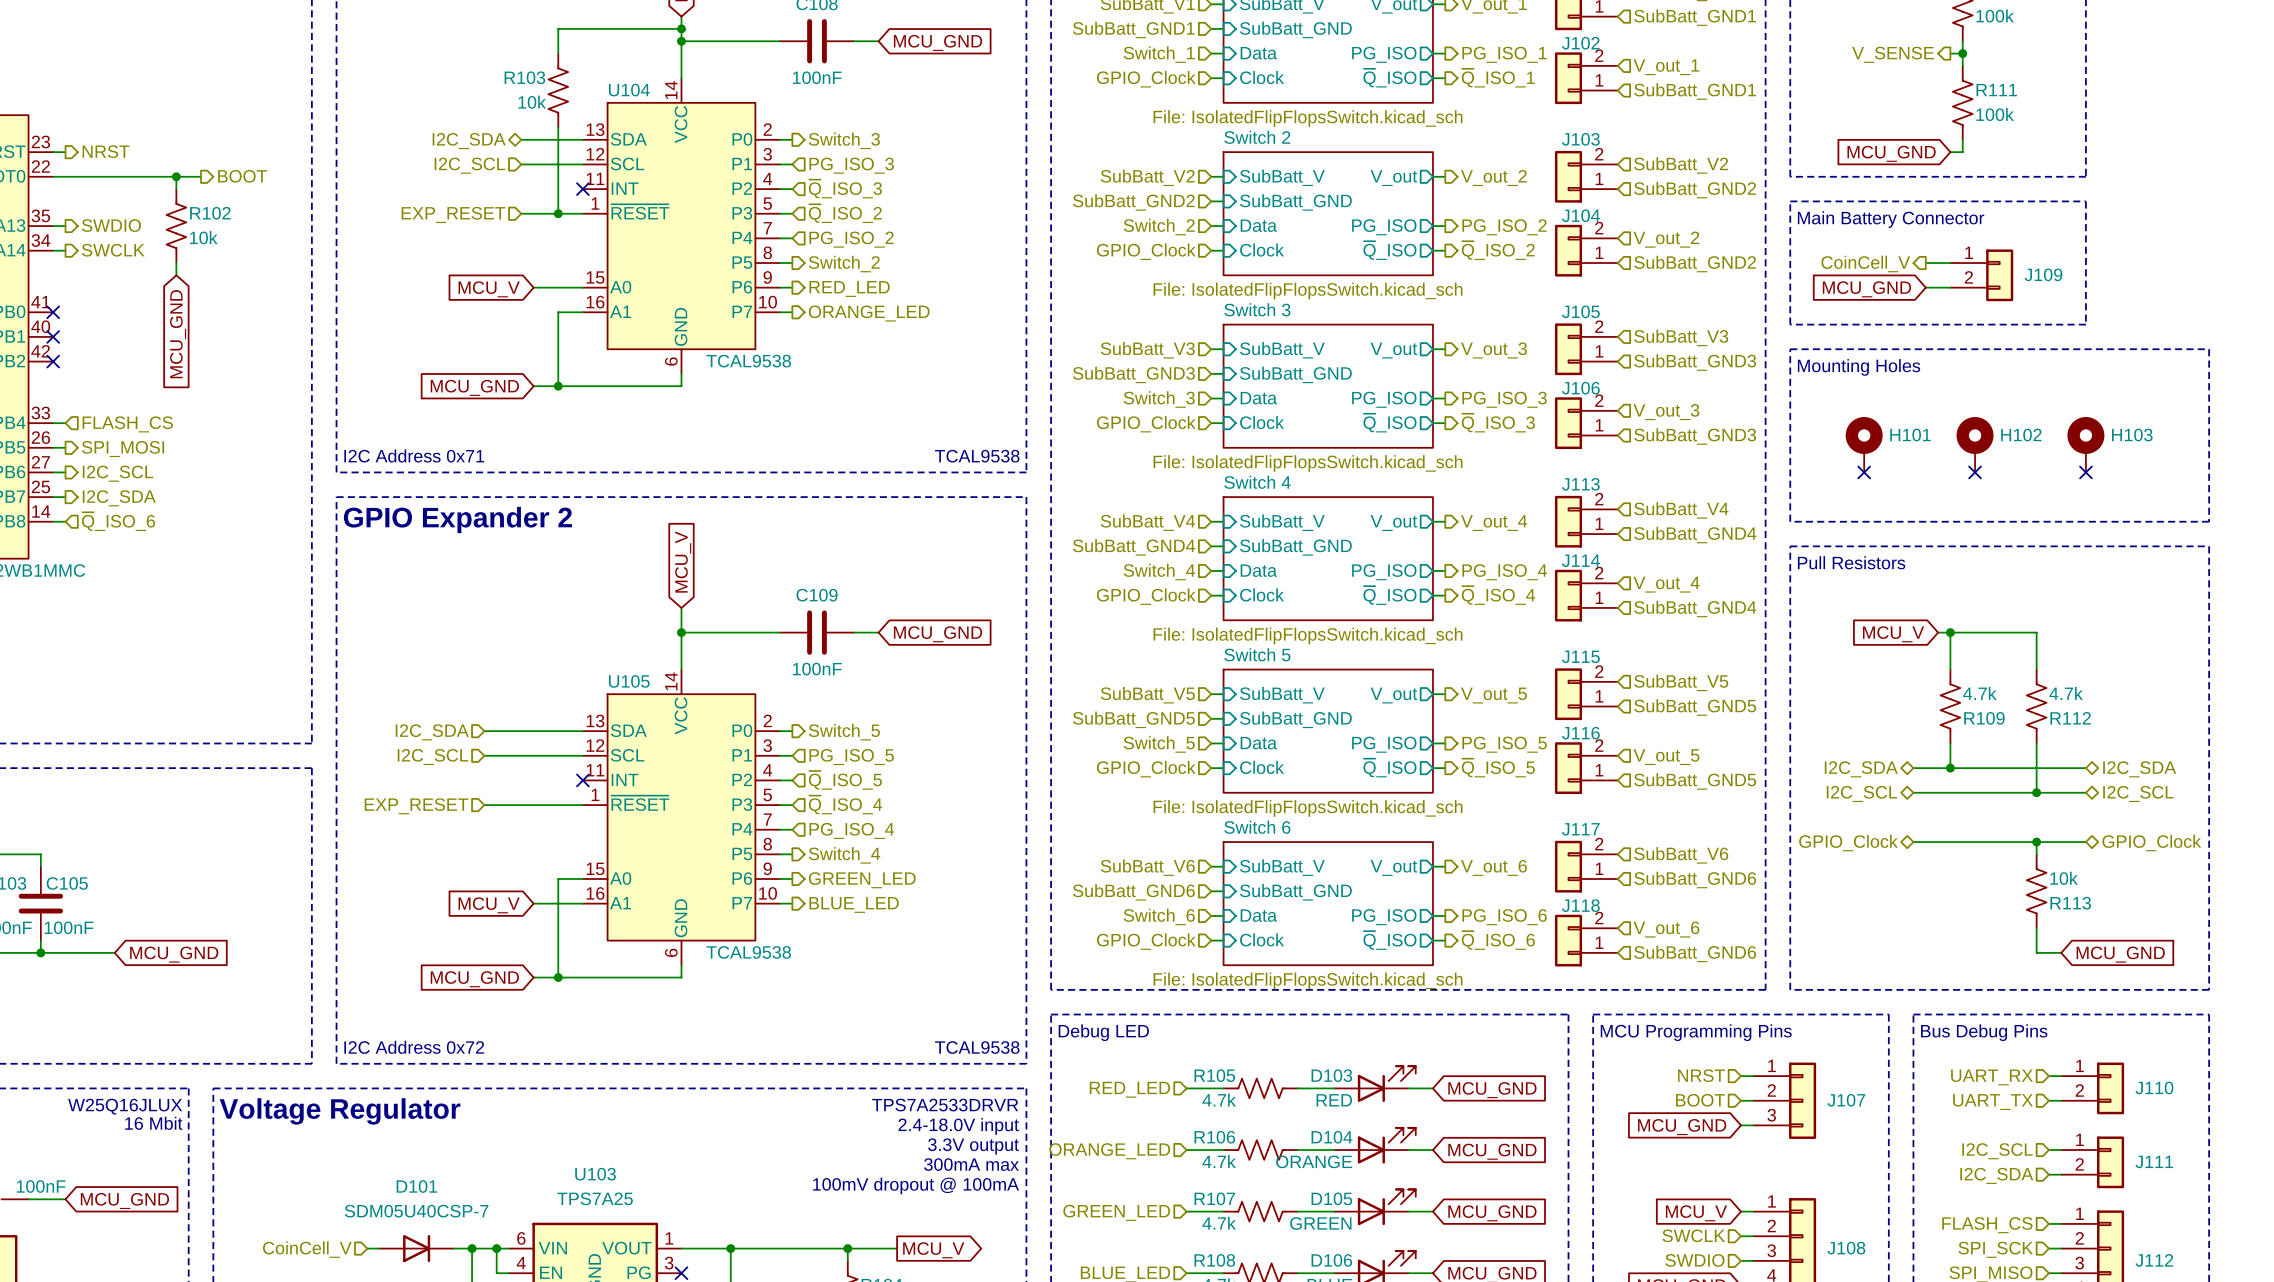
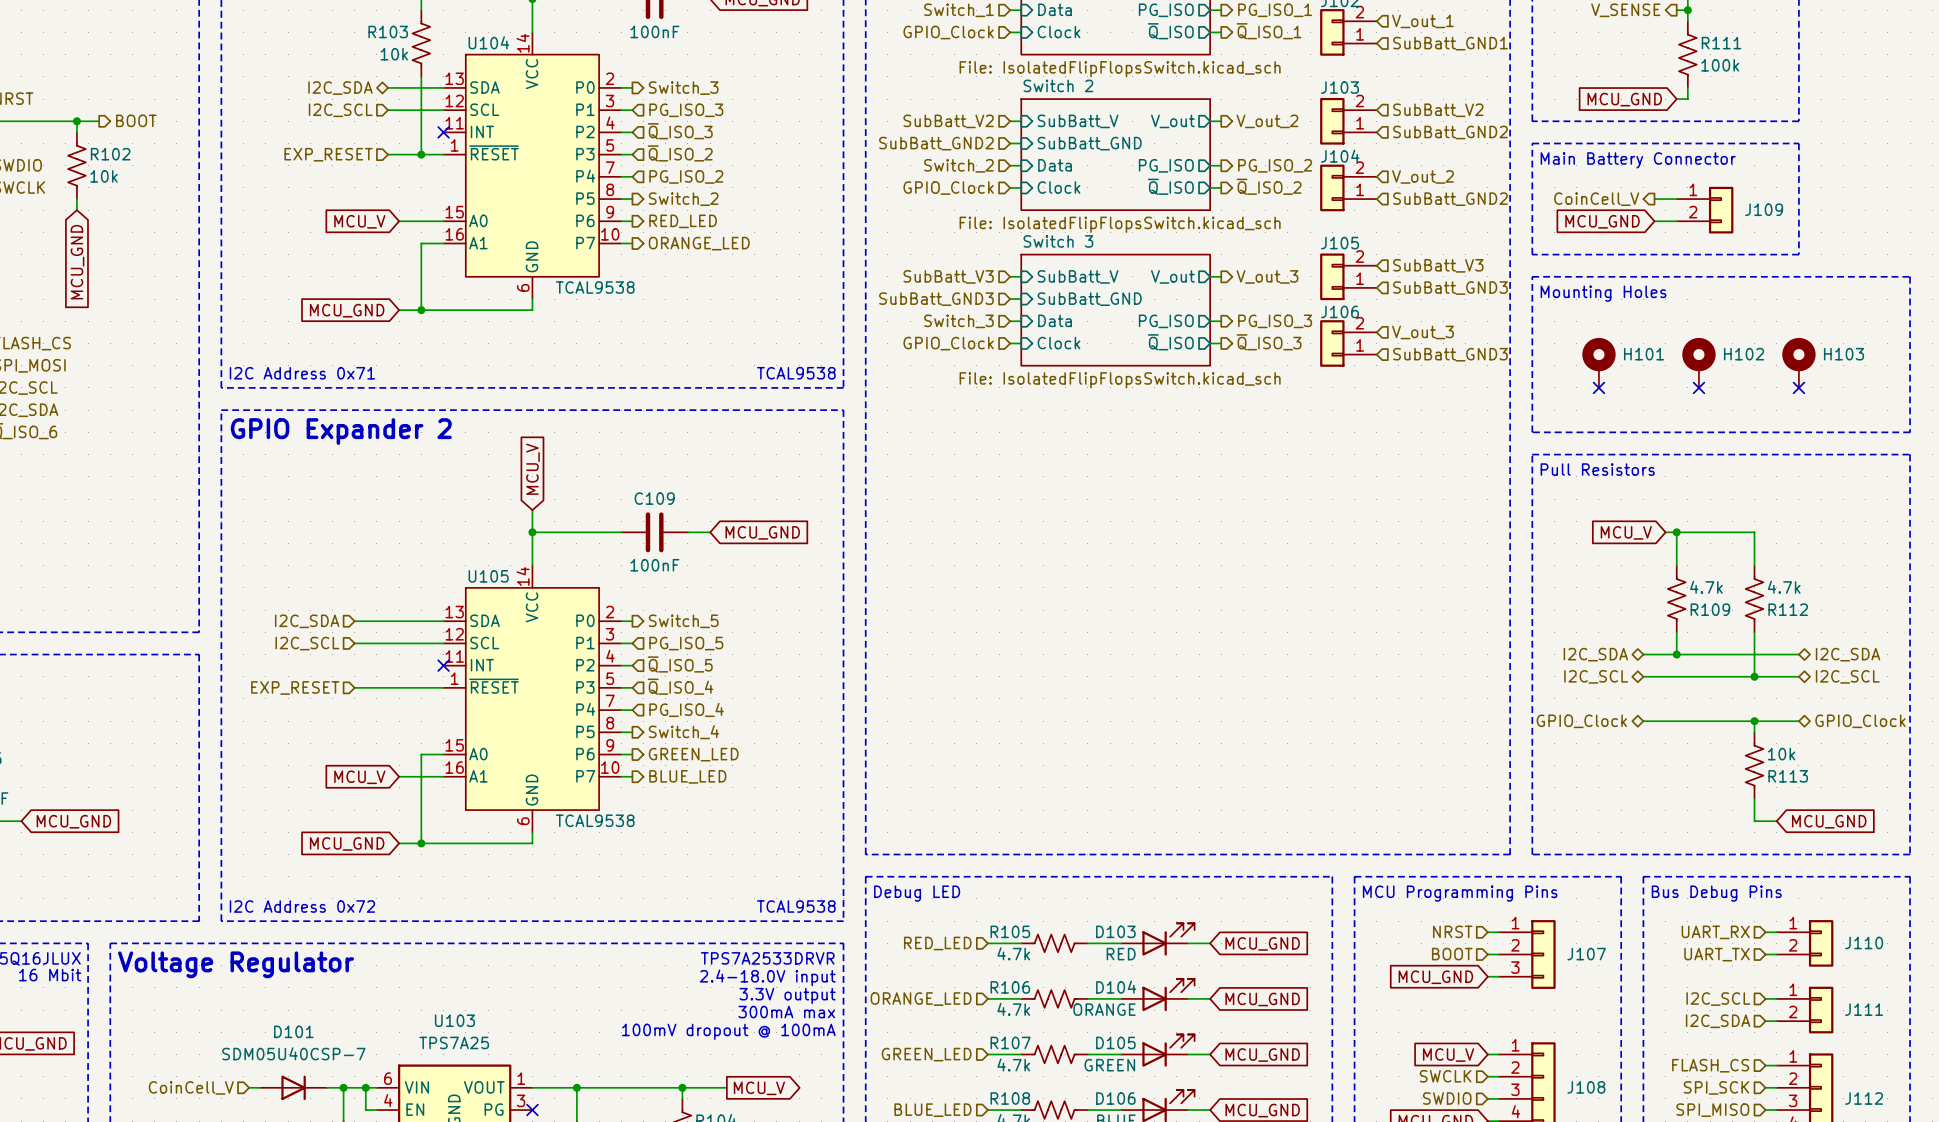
hierarchical label: SubBatt_V4 (1681, 510) -> none
wire: (1211, 521) (1223, 521) -> none
wire: (1432, 521) (1445, 521) -> none
J113: (1586, 521) -> none
hierarchical label: SubBatt_V4 (1147, 522) -> none
sheet pin: SubBatt_V (1282, 522) -> none
sheet pin: V_out (1393, 523) -> none
hierarchical label: V_out_4 (1494, 523) -> none
hierarchical label: SubBatt_GND4 (1695, 535) -> none
wire: (1211, 546) (1223, 546) -> none
hierarchical label: SubBatt_GND4 (1134, 547) -> none
sheet pin: SubBatt_GND (1295, 547) -> none
sheet Switch 4: File: IsolatedFlipFlopsSwitch.kicad_sch (1328, 558) -> none
sheet pin: Data (1258, 570) -> none
hierarchical label: Switch_4 (1159, 571) -> none
wire: (1211, 571) (1223, 571) -> none
wire: (1432, 571) (1445, 571) -> none
sheet pin: PG_ISO (1384, 572) -> none
hierarchical label: PG_ISO_4 (1504, 572) -> none
hierarchical label: V_out_4 (1666, 584) -> none
sheet pin: Clock (1262, 594) -> none
wire: (1211, 595) (1223, 595) -> none
sheet pin: ~{Q}_ISO (1389, 595) -> none
wire: (1432, 595) (1445, 595) -> none
hierarchical label: ~{Q}_ISO_4 (1498, 595) -> none
J114: (1586, 595) -> none
hierarchical label: GPIO_Clock (1146, 596) -> none
hierarchical label: SubBatt_GND4 (1695, 608) -> none
hierarchical label: SubBatt_V5 (1681, 682) -> none
wire: (1211, 694) (1223, 694) -> none
wire: (1432, 694) (1445, 694) -> none
J115: (1586, 694) -> none
hierarchical label: SubBatt_V5 (1147, 695) -> none
sheet pin: SubBatt_V (1282, 695) -> none
sheet pin: V_out (1393, 695) -> none
hierarchical label: V_out_5 (1493, 695) -> none
hierarchical label: SubBatt_GND5 (1695, 707) -> none
wire: (1211, 718) (1223, 718) -> none
hierarchical label: SubBatt_GND5 (1133, 719) -> none
sheet pin: SubBatt_GND (1295, 719) -> none
sheet Switch 5: File: IsolatedFlipFlopsSwitch.kicad_sch (1328, 731) -> none
wire: (1211, 743) (1223, 743) -> none
sheet pin: Data (1258, 743) -> none
wire: (1432, 743) (1445, 743) -> none
hierarchical label: Switch_5 (1159, 744) -> none
sheet pin: PG_ISO (1384, 744) -> none
hierarchical label: PG_ISO_5 (1504, 744) -> none
hierarchical label: V_out_5 (1666, 757) -> none
sheet pin: Clock (1262, 767) -> none
wire: (1211, 768) (1223, 768) -> none
sheet pin: ~{Q}_ISO (1389, 768) -> none
wire: (1432, 768) (1445, 768) -> none
hierarchical label: ~{Q}_ISO_5 (1498, 768) -> none
J116: (1586, 768) -> none
hierarchical label: GPIO_Clock (1146, 769) -> none
hierarchical label: SubBatt_GND5 (1695, 781) -> none
hierarchical label: SubBatt_V6 (1681, 855) -> none
wire: (1211, 866) (1223, 866) -> none
wire: (1432, 866) (1445, 866) -> none
J117: (1586, 866) -> none
hierarchical label: SubBatt_V6 (1147, 867) -> none
sheet pin: SubBatt_V (1282, 867) -> none
sheet pin: V_out (1393, 867) -> none
hierarchical label: V_out_6 (1493, 867) -> none
hierarchical label: SubBatt_GND6 (1695, 879) -> none
wire: (1211, 891) (1223, 891) -> none
hierarchical label: SubBatt_GND6 (1133, 892) -> none
sheet pin: SubBatt_GND (1295, 892) -> none
sheet Switch 6: File: IsolatedFlipFlopsSwitch.kicad_sch (1328, 903) -> none
wire: (1211, 915) (1223, 915) -> none
sheet pin: Data (1258, 915) -> none
wire: (1432, 915) (1445, 915) -> none
hierarchical label: Switch_6 (1159, 916) -> none
sheet pin: PG_ISO (1384, 917) -> none
hierarchical label: PG_ISO_6 (1504, 917) -> none
hierarchical label: V_out_6 (1666, 929) -> none
sheet pin: Clock (1262, 939) -> none
wire: (1211, 940) (1223, 940) -> none
sheet pin: ~{Q}_ISO (1389, 940) -> none
wire: (1432, 940) (1445, 940) -> none
hierarchical label: ~{Q}_ISO_6 (1498, 940) -> none
J118: (1586, 940) -> none
hierarchical label: GPIO_Clock (1146, 941) -> none
hierarchical label: SubBatt_GND6 (1695, 953) -> none

